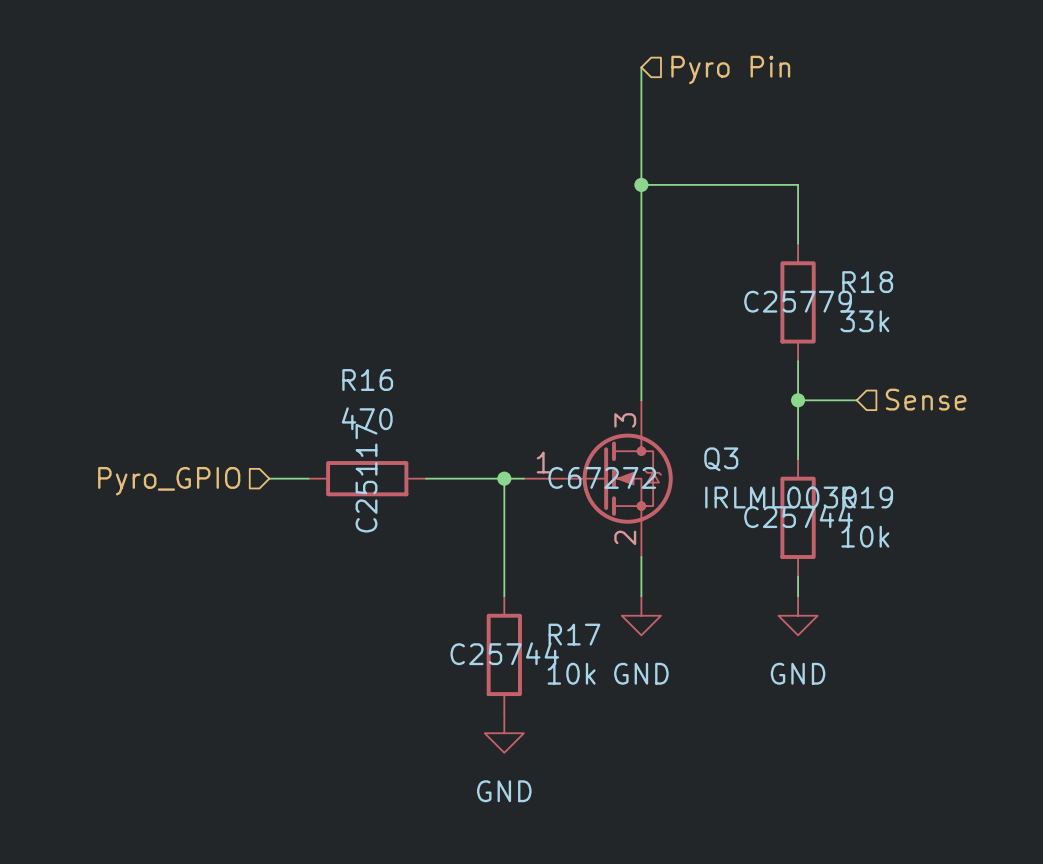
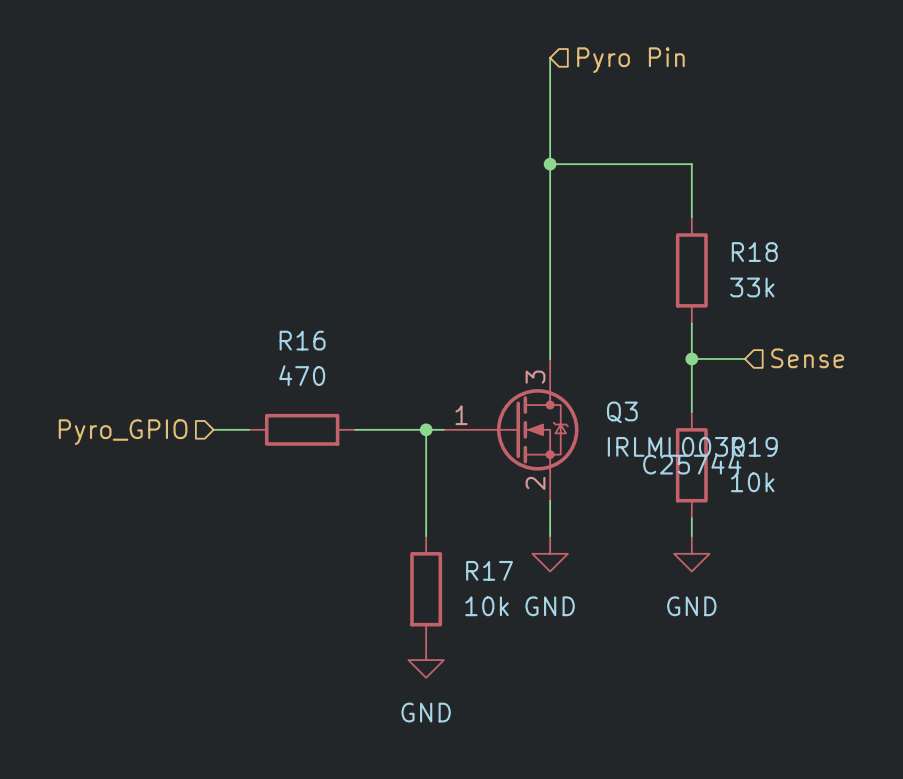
R18 text: C25779 (798, 301) -> none
Q3 text: C67272 (602, 477) -> none
R16 text: C25117 (366, 478) -> none
R17 text: C25744 (504, 653) -> none

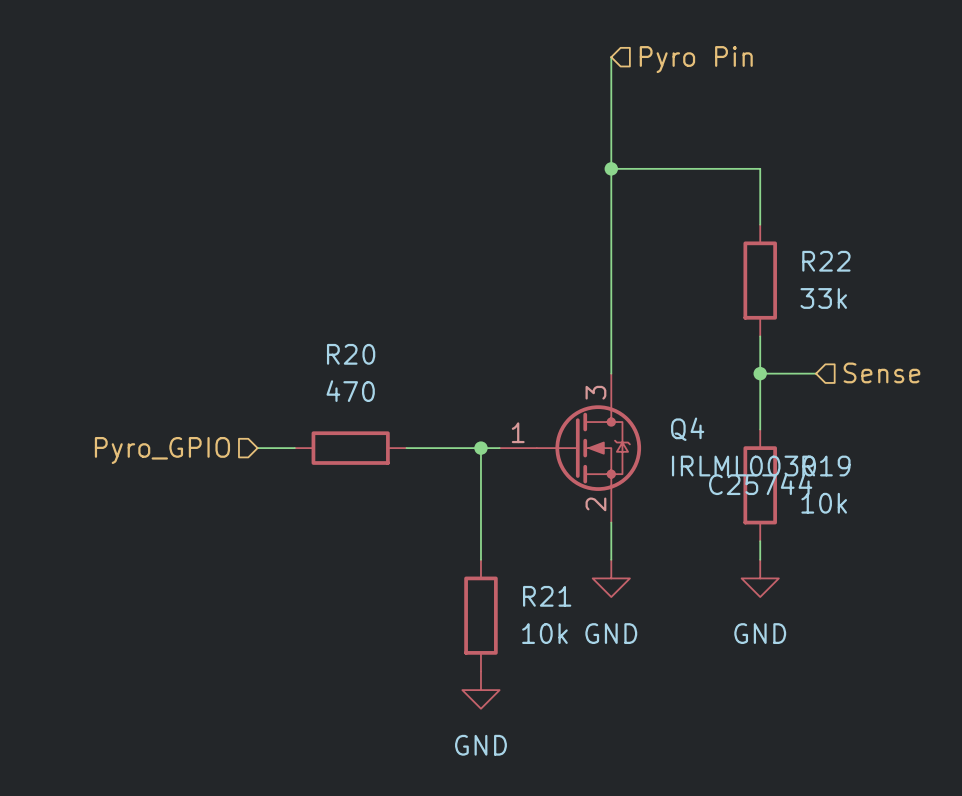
R18 name: R18 (754, 252) -> R22 (826, 261)
R16 name: R16 (302, 340) -> R20 (351, 354)
Q3 name: Q3 (622, 412) -> Q4 (687, 429)
R17 name: R17 (489, 570) -> R21 (547, 596)

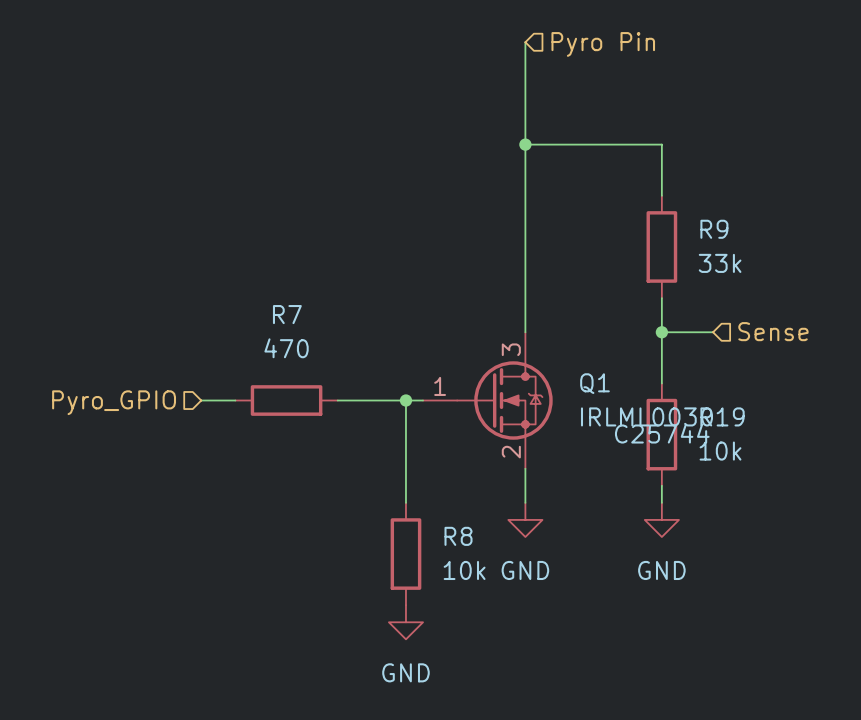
R22 name: R22 (826, 261) -> R9 (714, 229)
R20 name: R20 (351, 354) -> R7 (287, 314)
Q4 name: Q4 (687, 429) -> Q1 (594, 383)
R21 name: R21 (547, 596) -> R8 (458, 536)

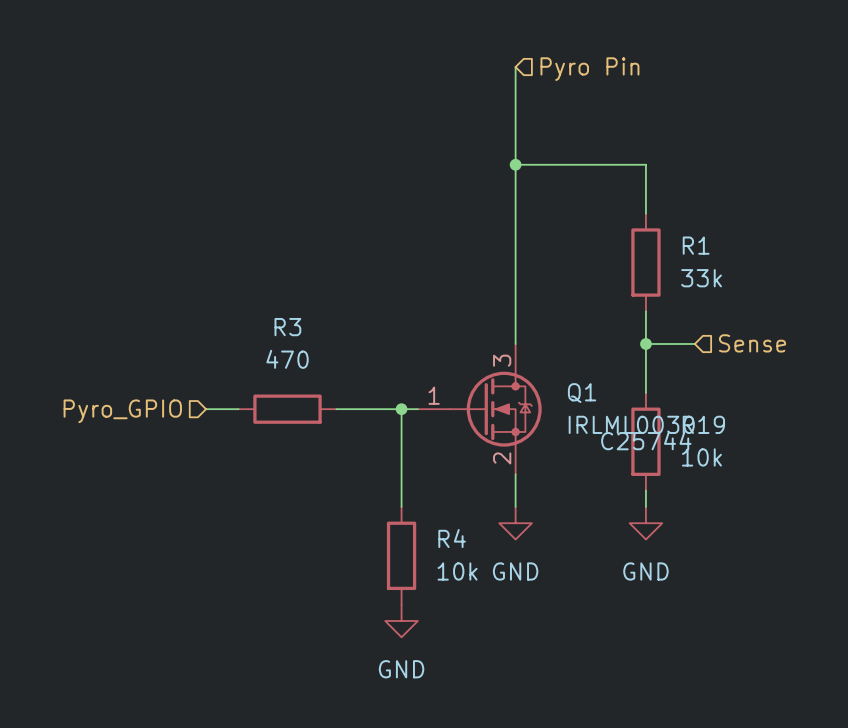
R9 name: R9 (714, 229) -> R1 (696, 245)
R7 name: R7 (287, 314) -> R3 (287, 327)
R8 name: R8 (458, 536) -> R4 (452, 538)

